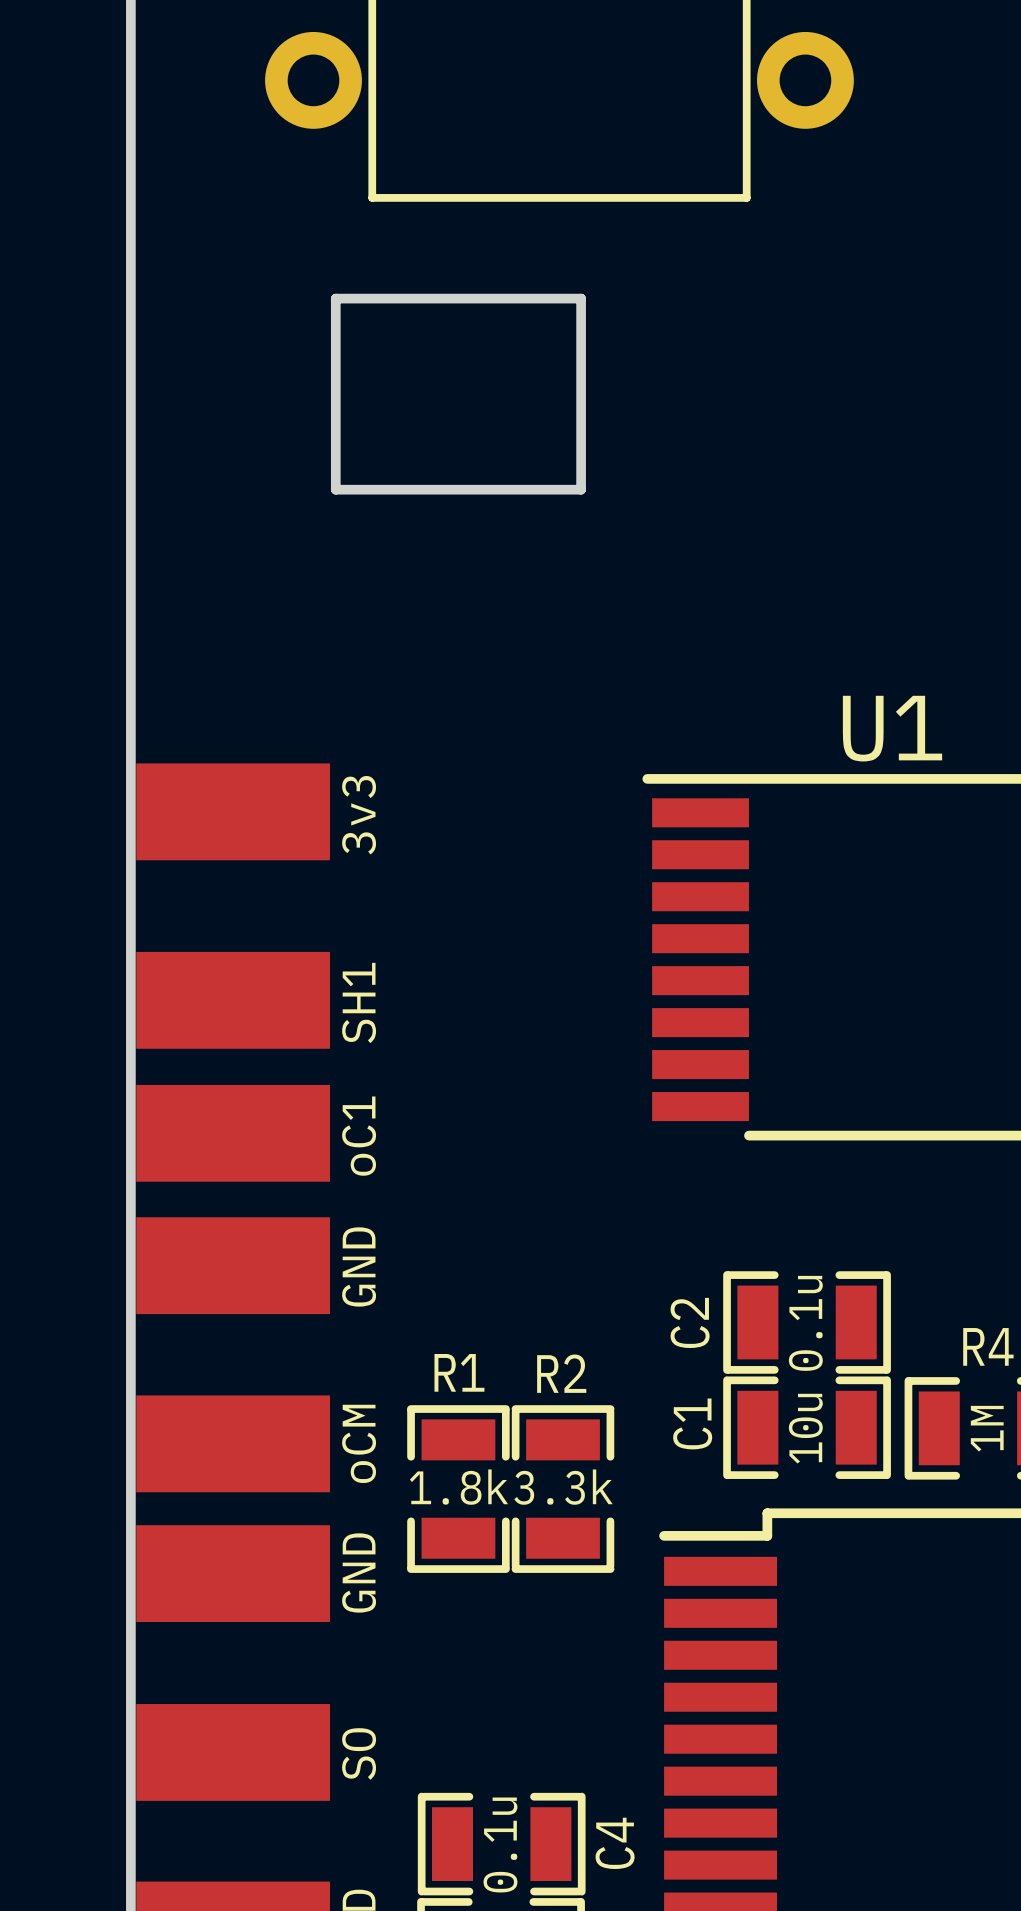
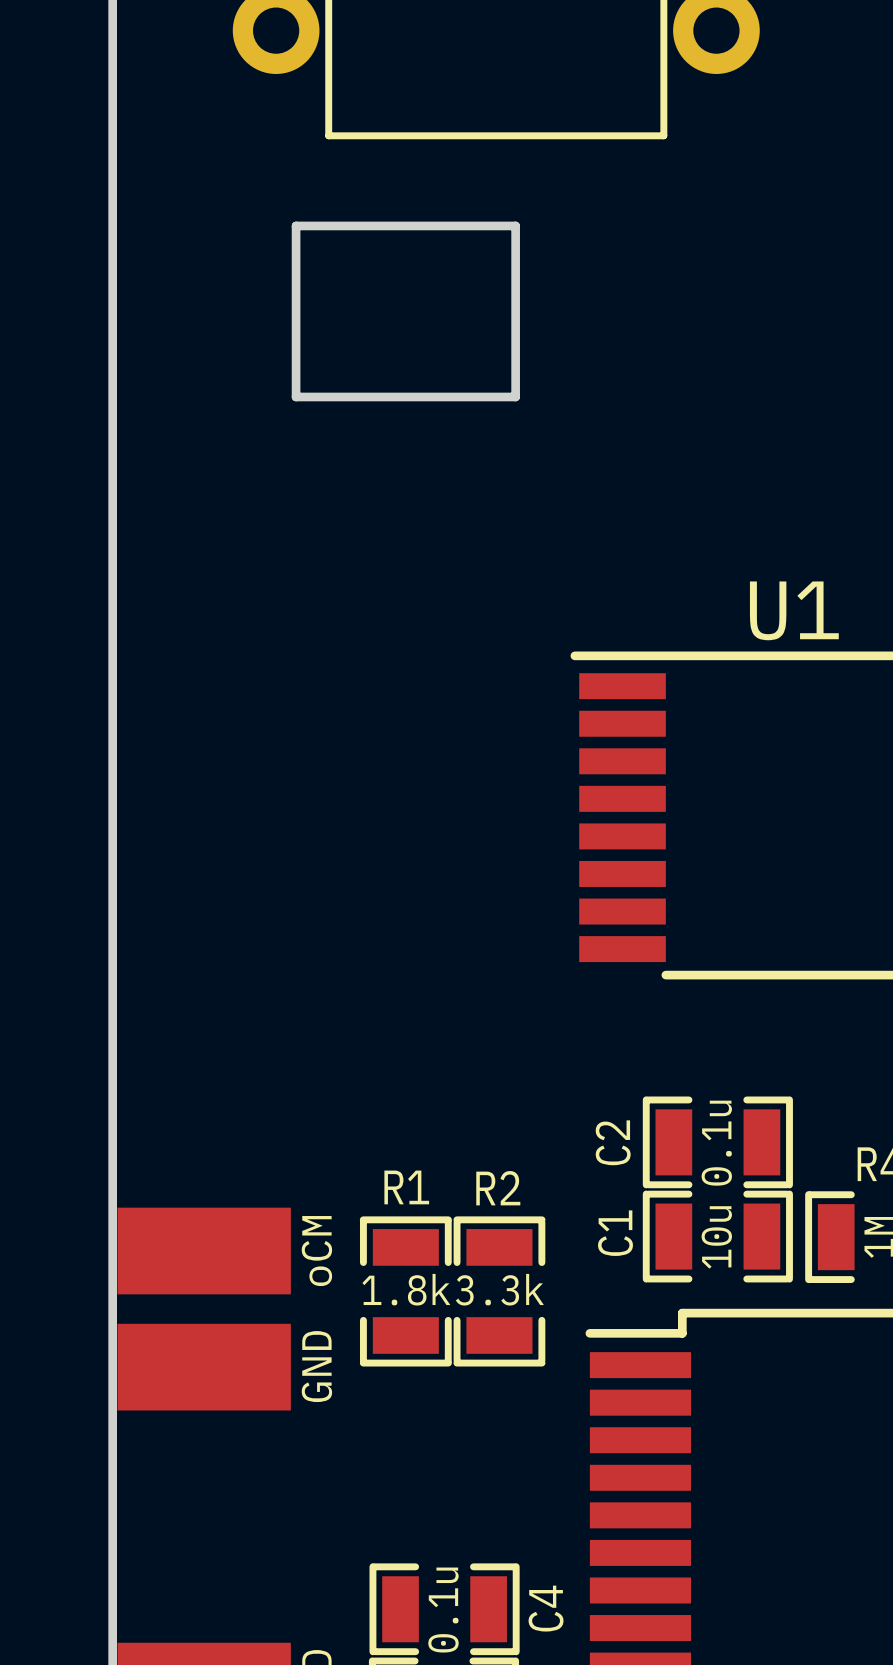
part: 3v3 (233, 811) -> none
part: SH1 (233, 1000) -> none
part: oC1 (233, 1133) -> none
part: GND (233, 1265) -> none
part: SO (233, 1752) -> none

